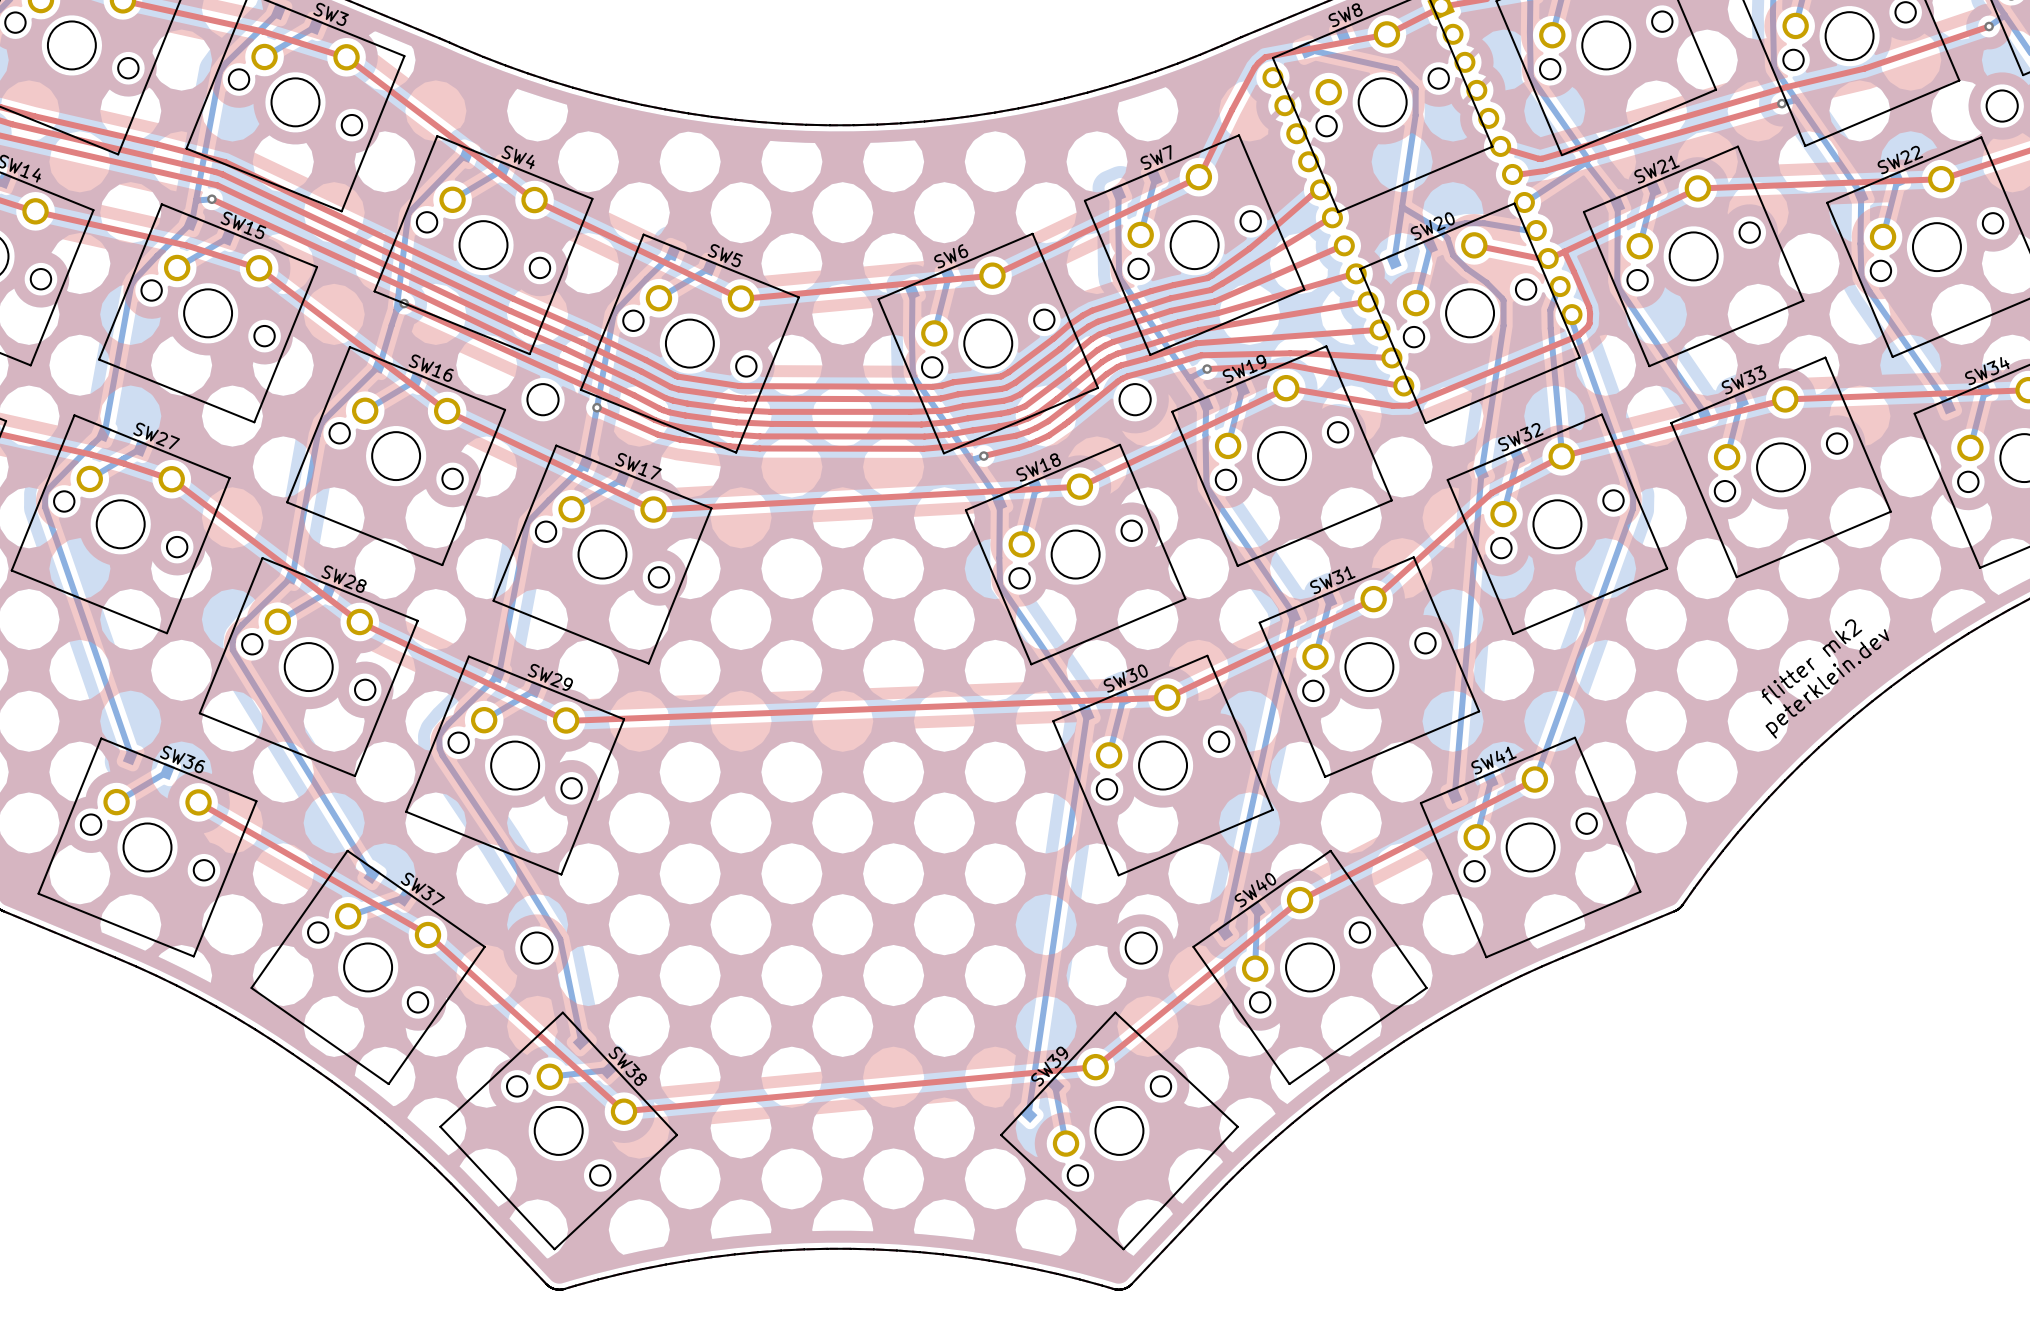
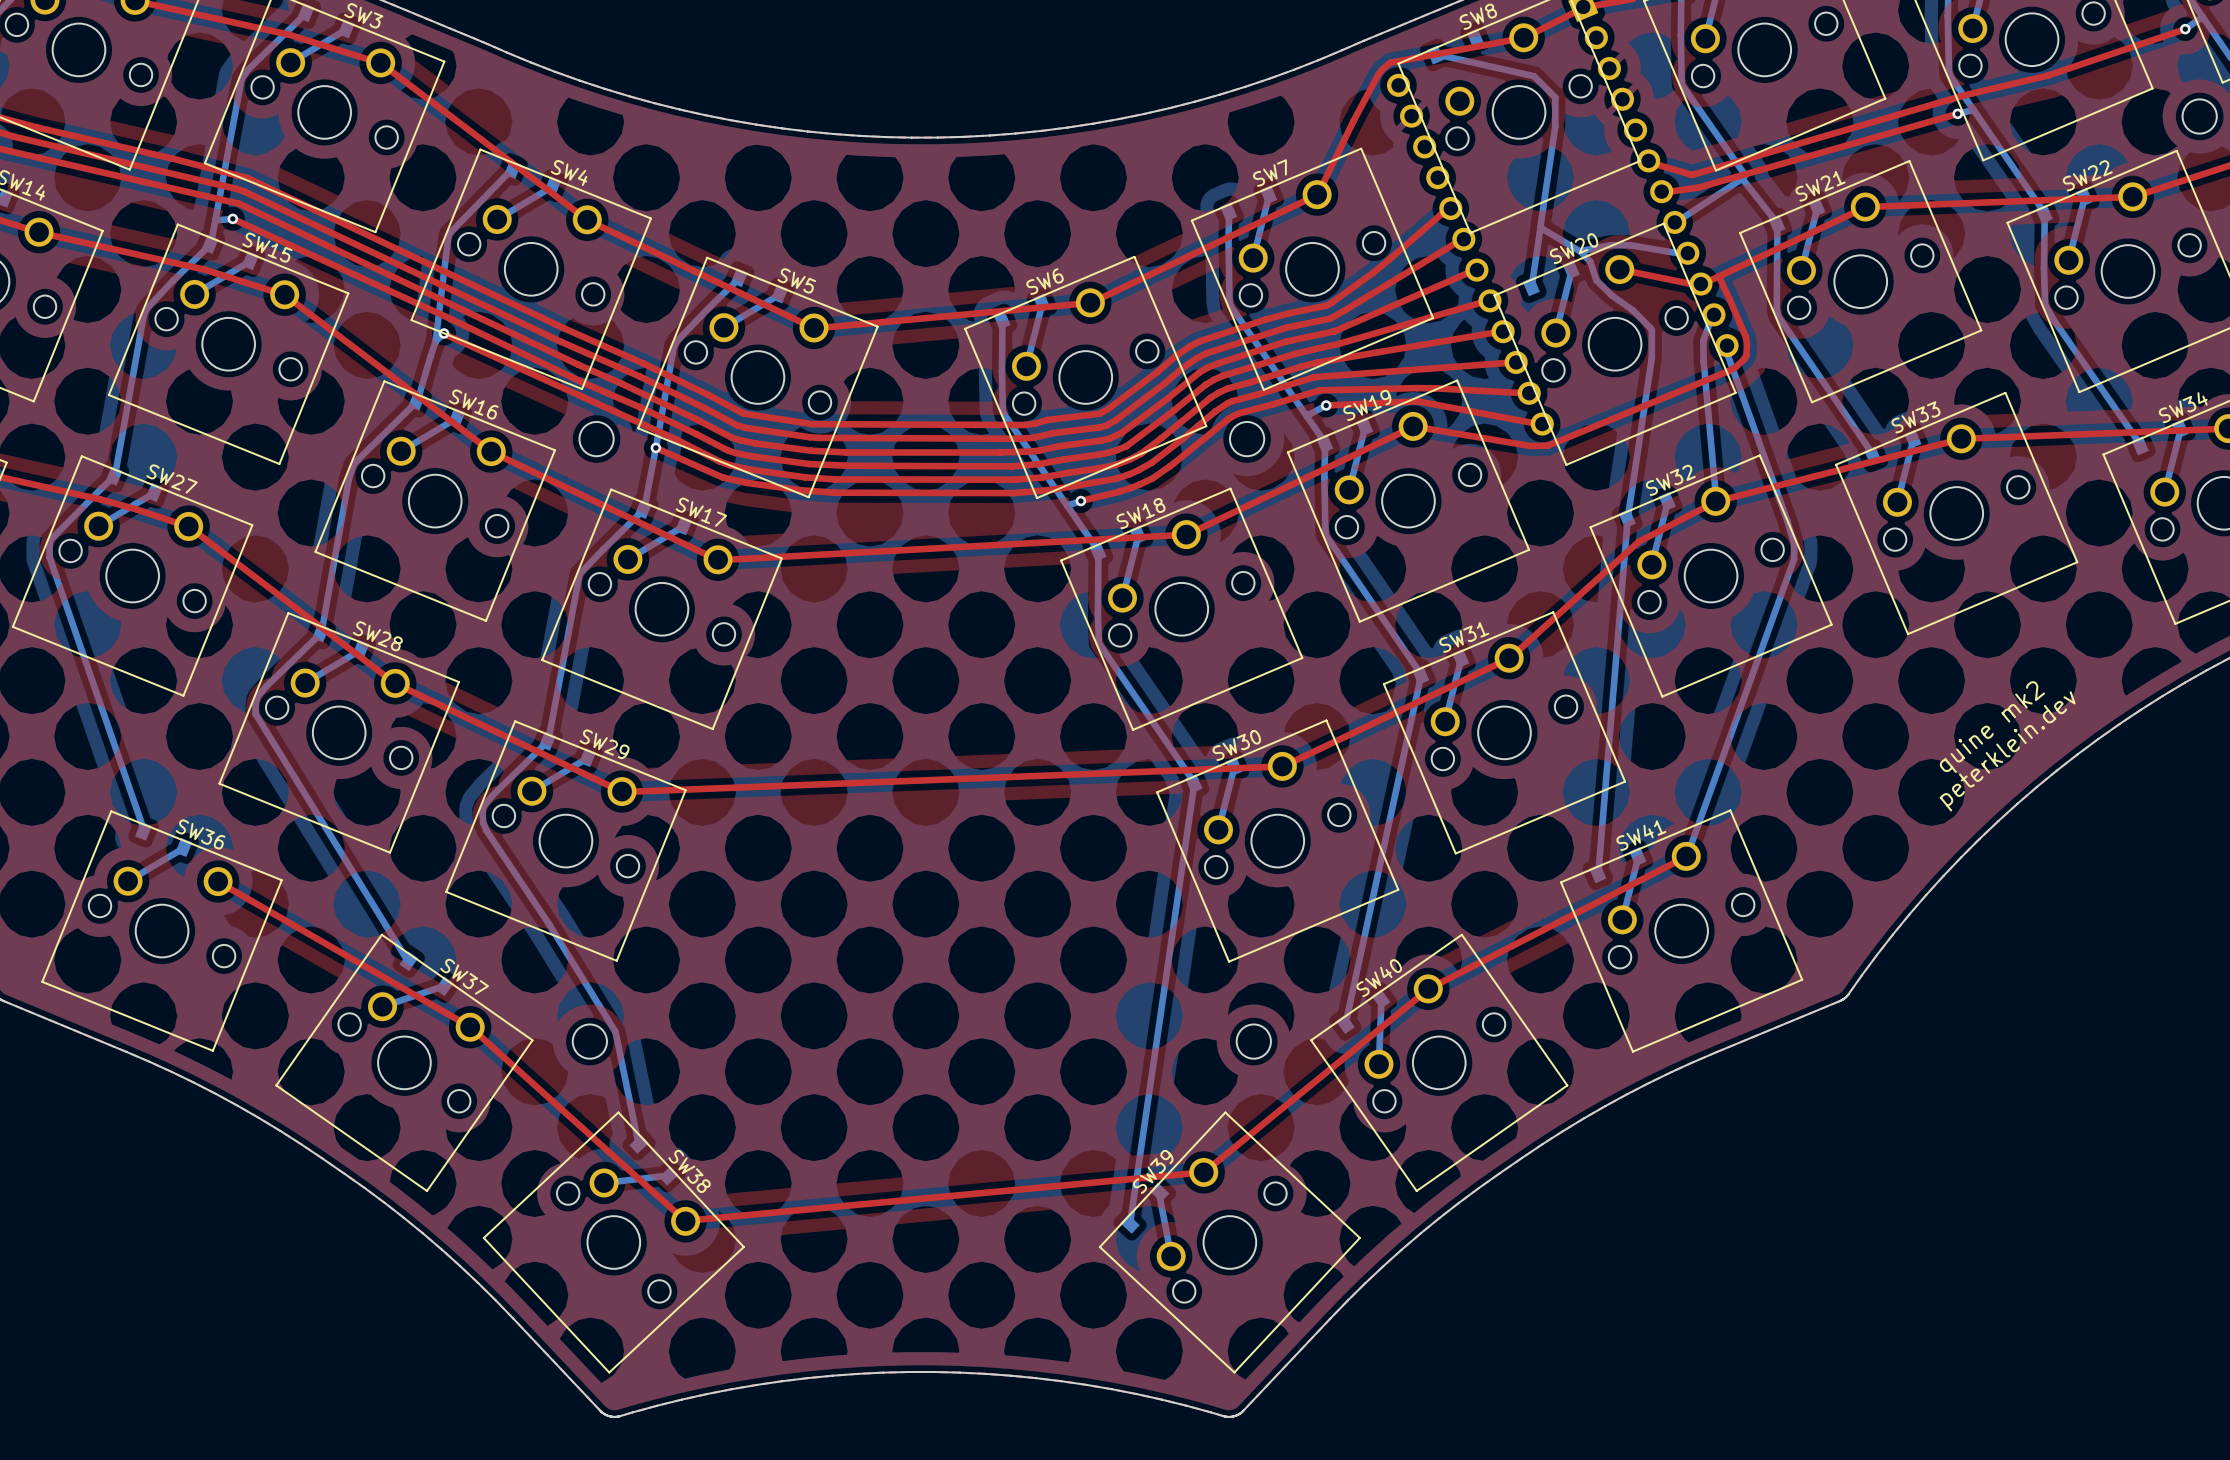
text: flitter mk2 (1812, 661) -> quine mk2 (1992, 727)

